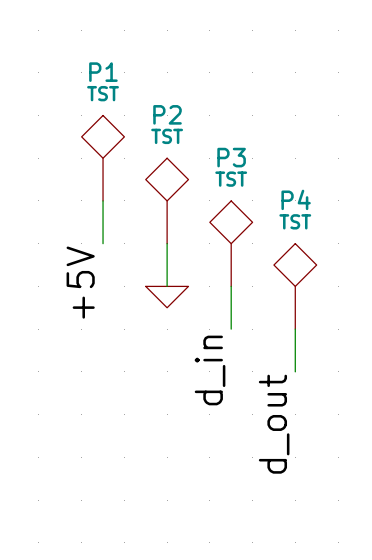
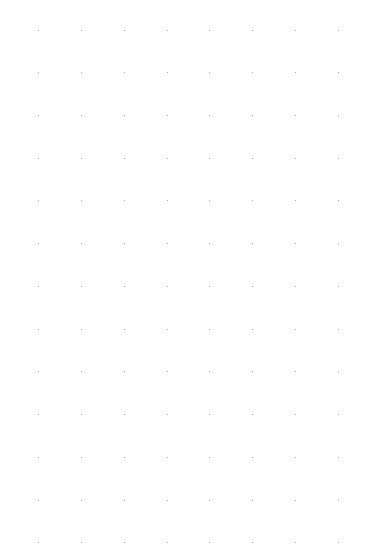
P1: TST (103, 158) -> none
wire: (103, 200) (103, 243) -> none
P2: TST (167, 200) -> none
wire: (167, 243) (167, 286) -> none
P3: TST (231, 243) -> none
label: +5V (80, 282) -> none
wire: (231, 286) (231, 329) -> none
P4: TST (295, 286) -> none
power symbol: (167, 297) -> none
wire: (295, 329) (295, 371) -> none
label: d_in (210, 370) -> none
label: d_out (274, 424) -> none

